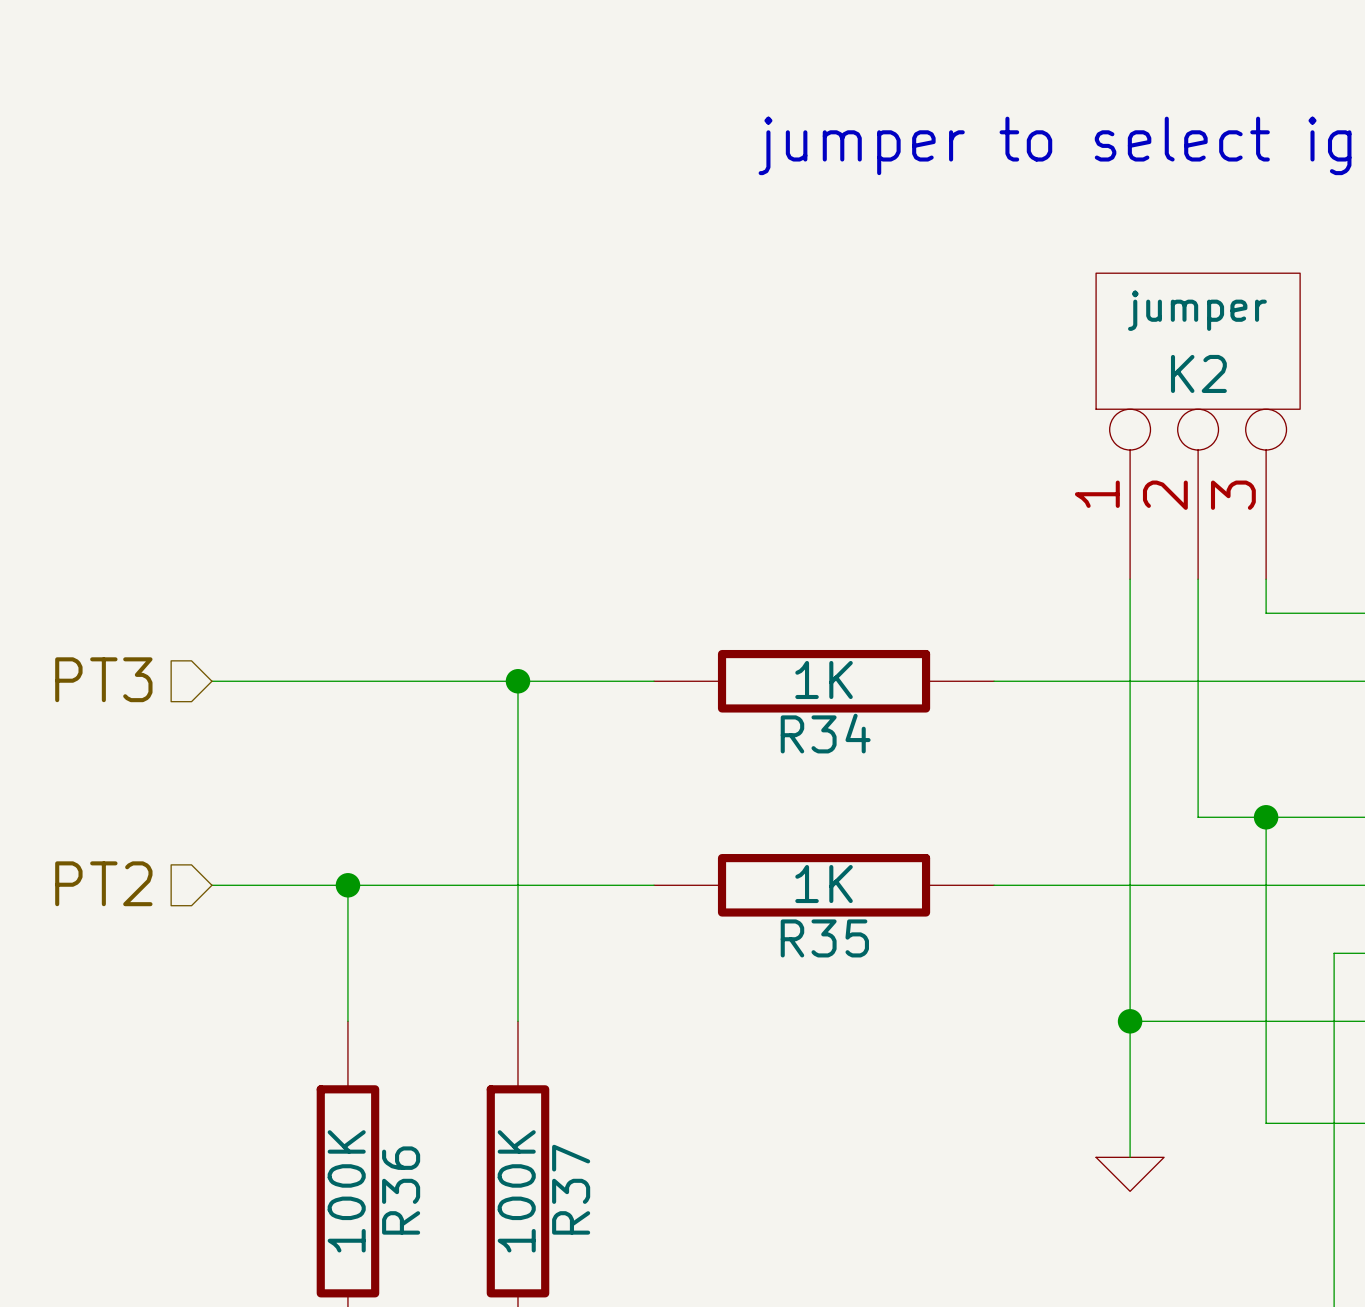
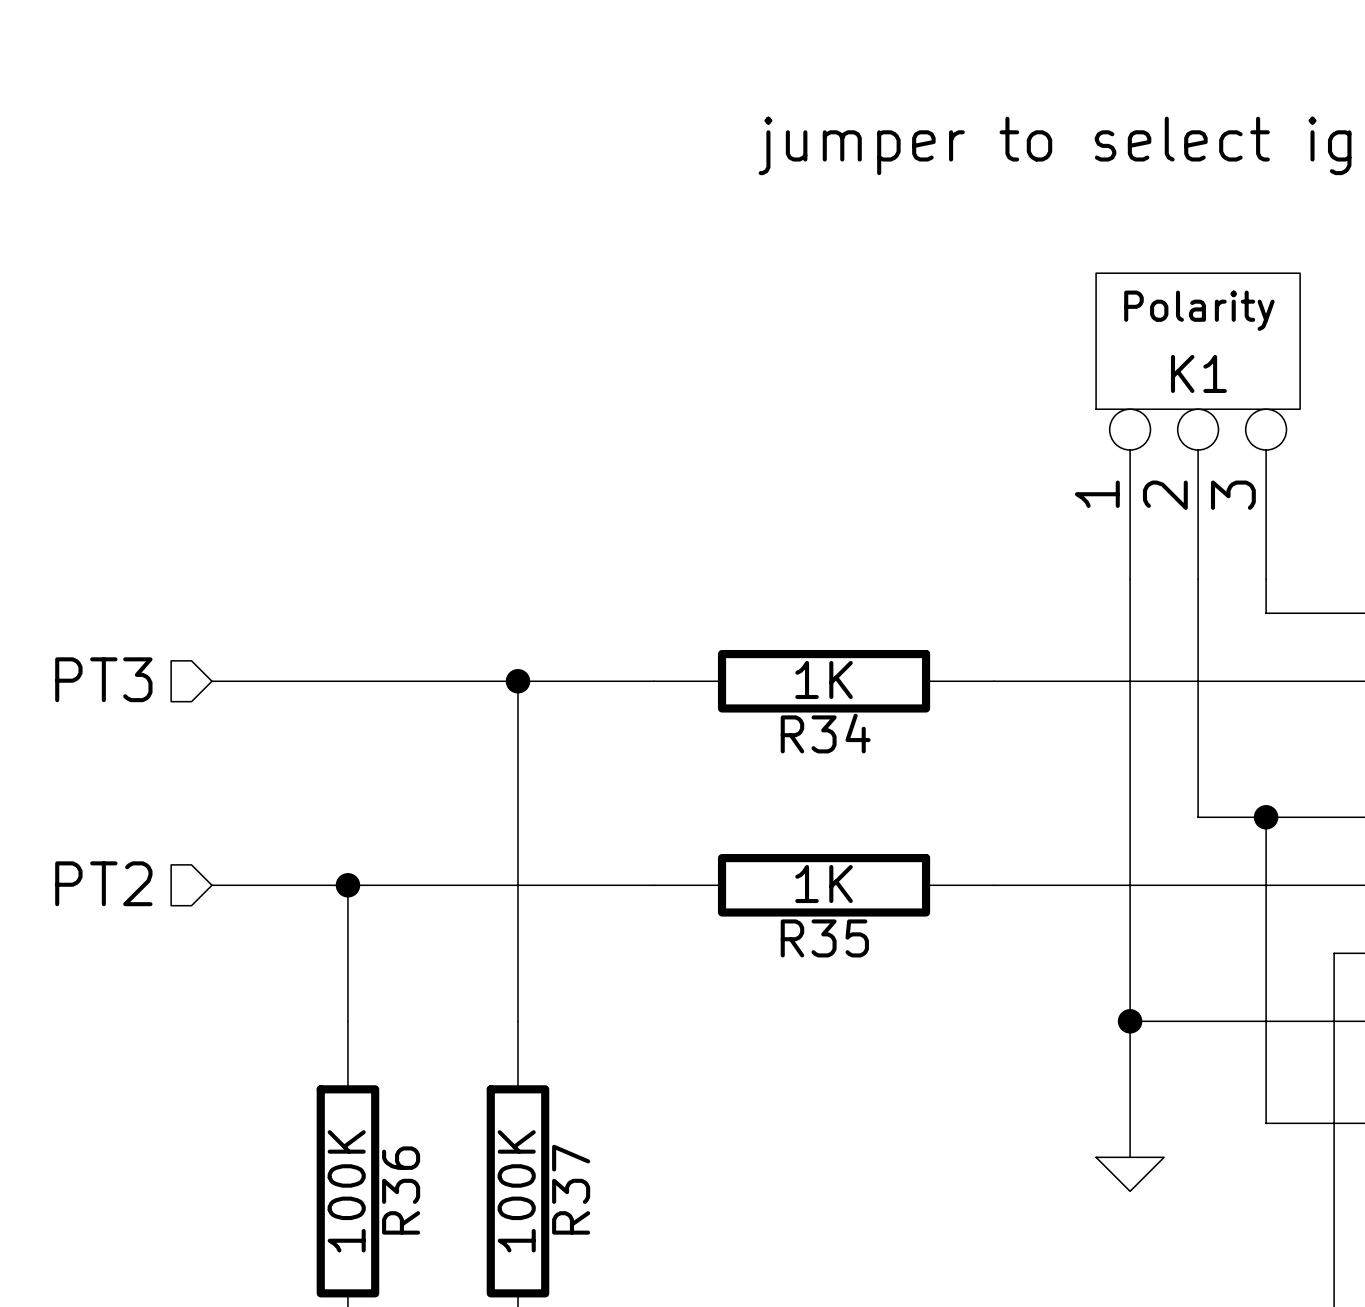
K2 value: jumper (1197, 310) -> Polarity (1199, 310)
K2 name: K2 (1198, 373) -> K1 (1198, 373)

